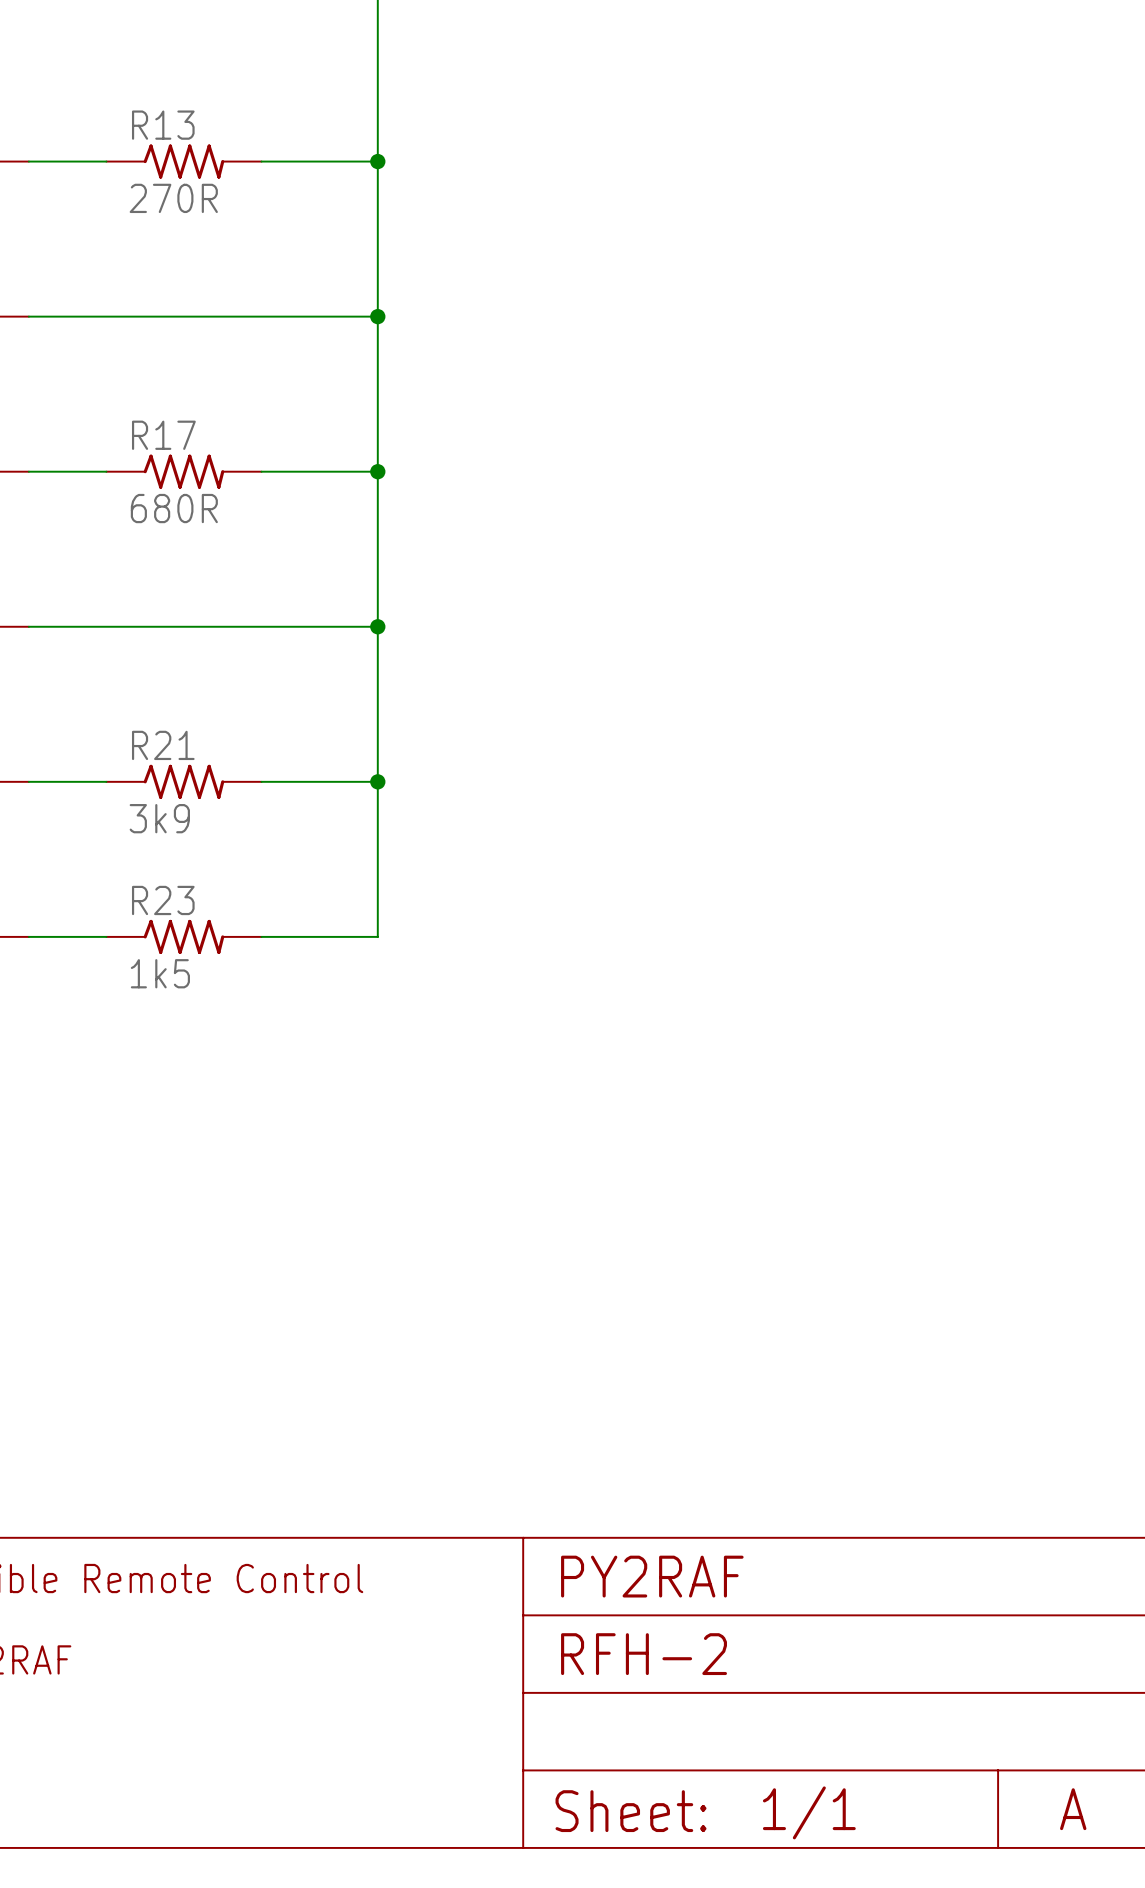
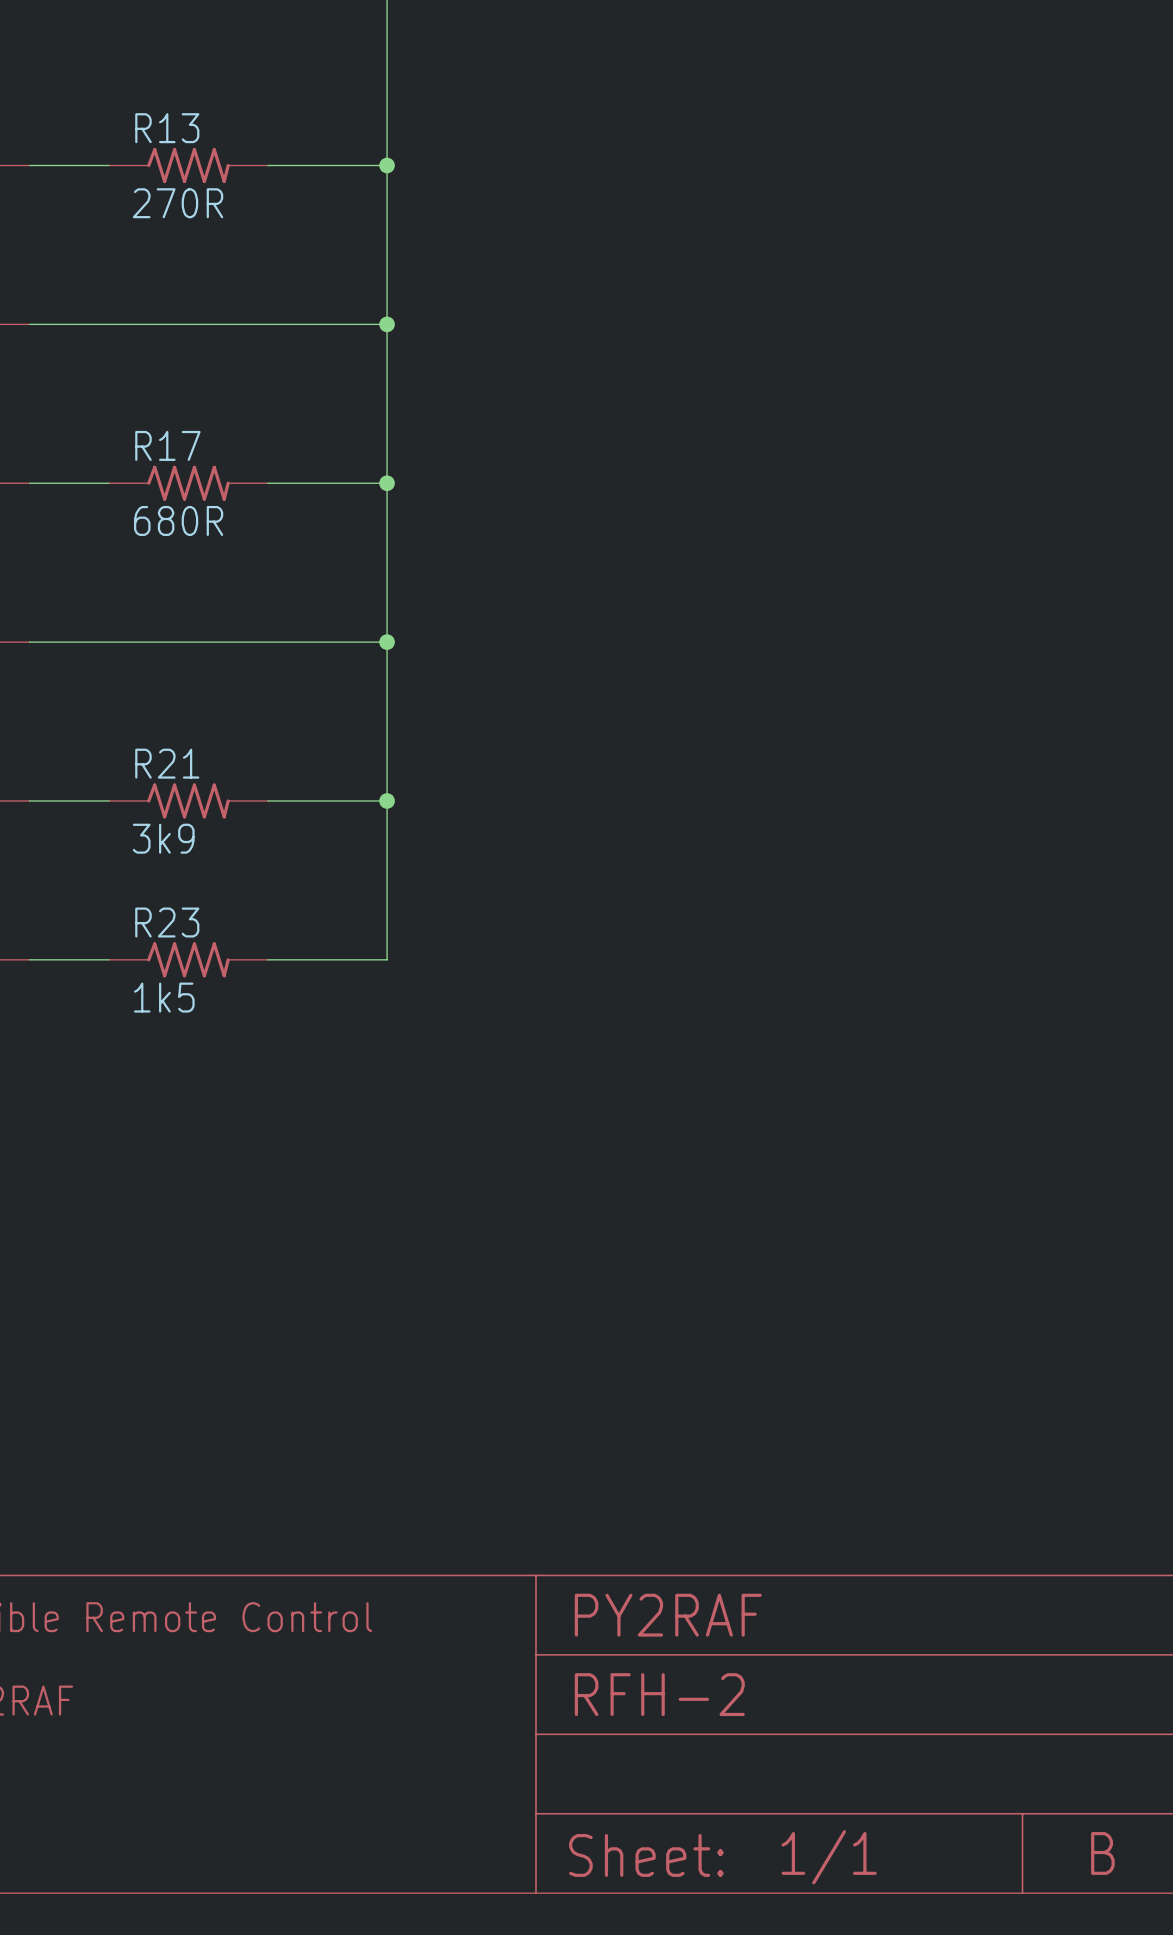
text: A (1073, 1809) -> B (1102, 1853)

